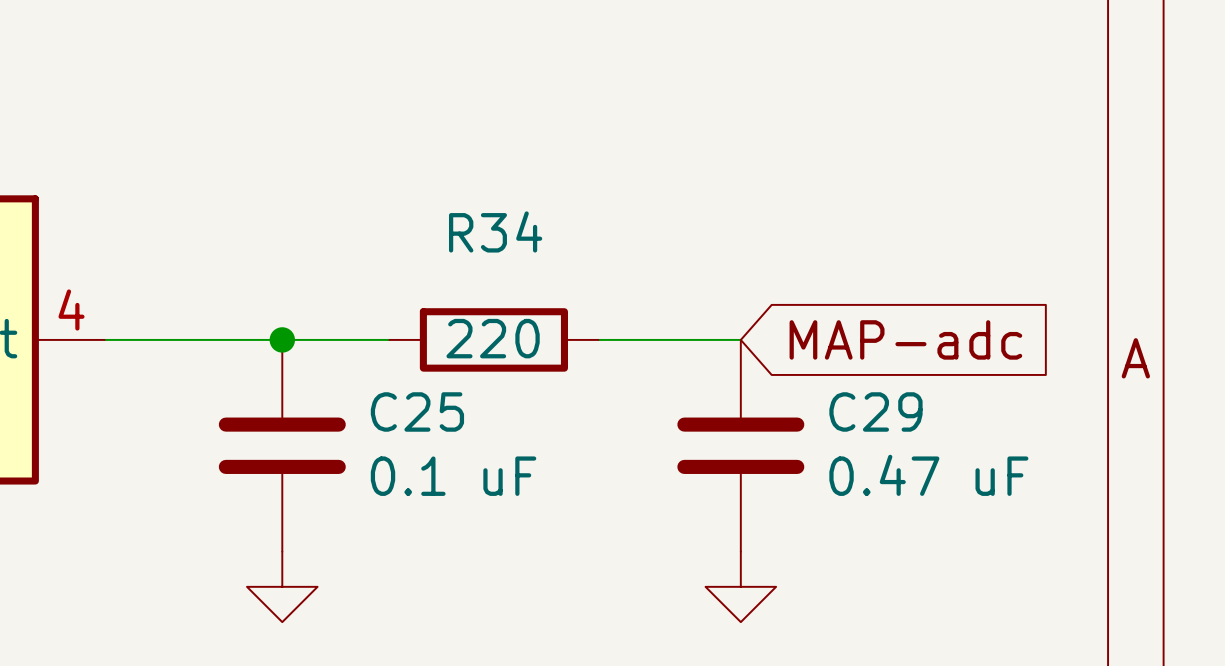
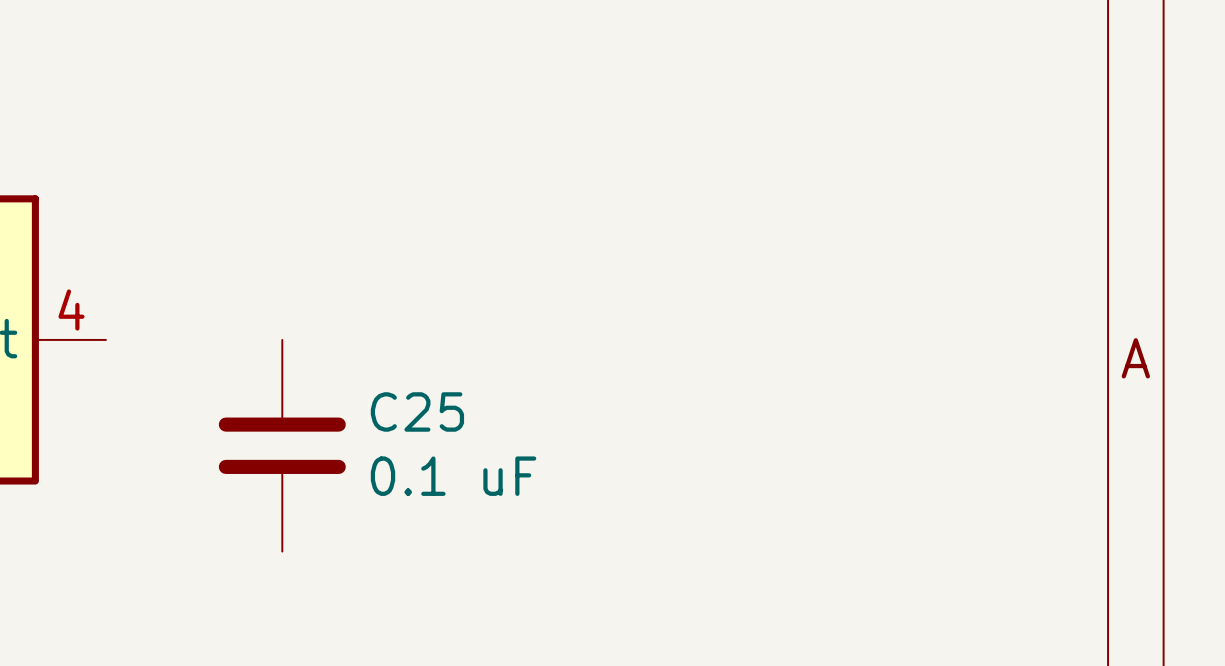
wire: (105, 339) (388, 339) -> none
junction: (282, 339) -> none
R34: 220 (493, 339) -> none
wire: (599, 339) (740, 339) -> none
global label: MAP-adc (905, 339) -> none
C29: 0.47 uF (740, 445) -> none
power symbol: (282, 586) -> none
power symbol: (740, 586) -> none

